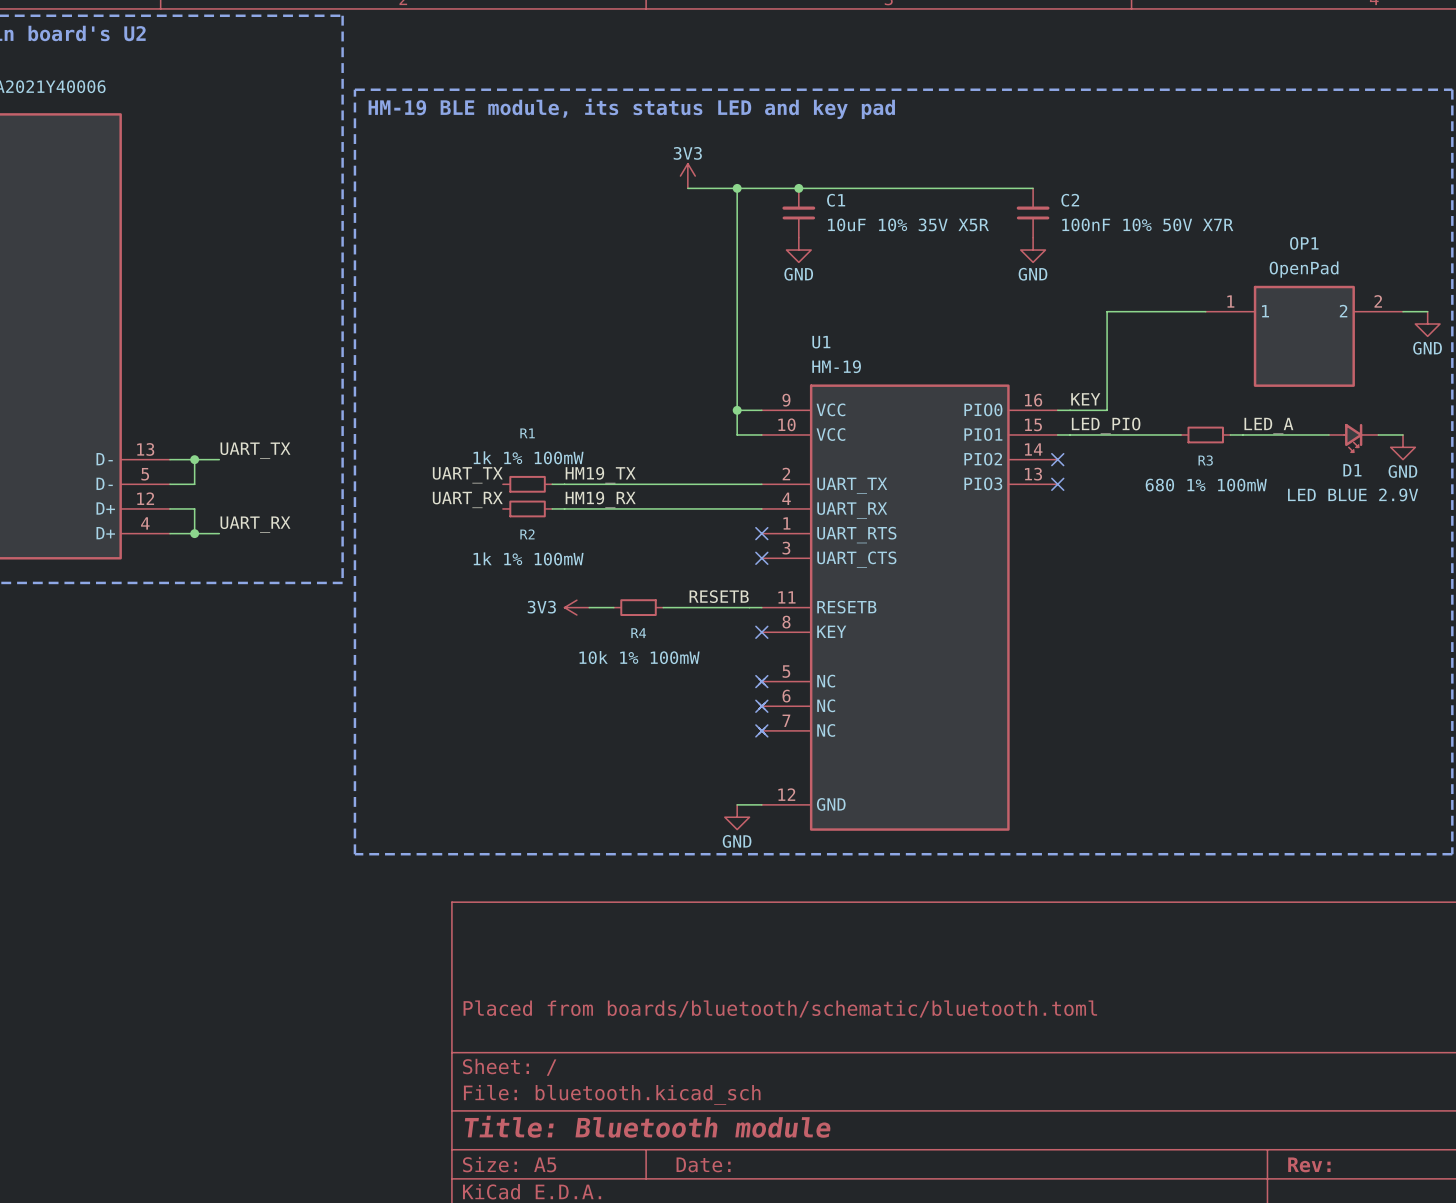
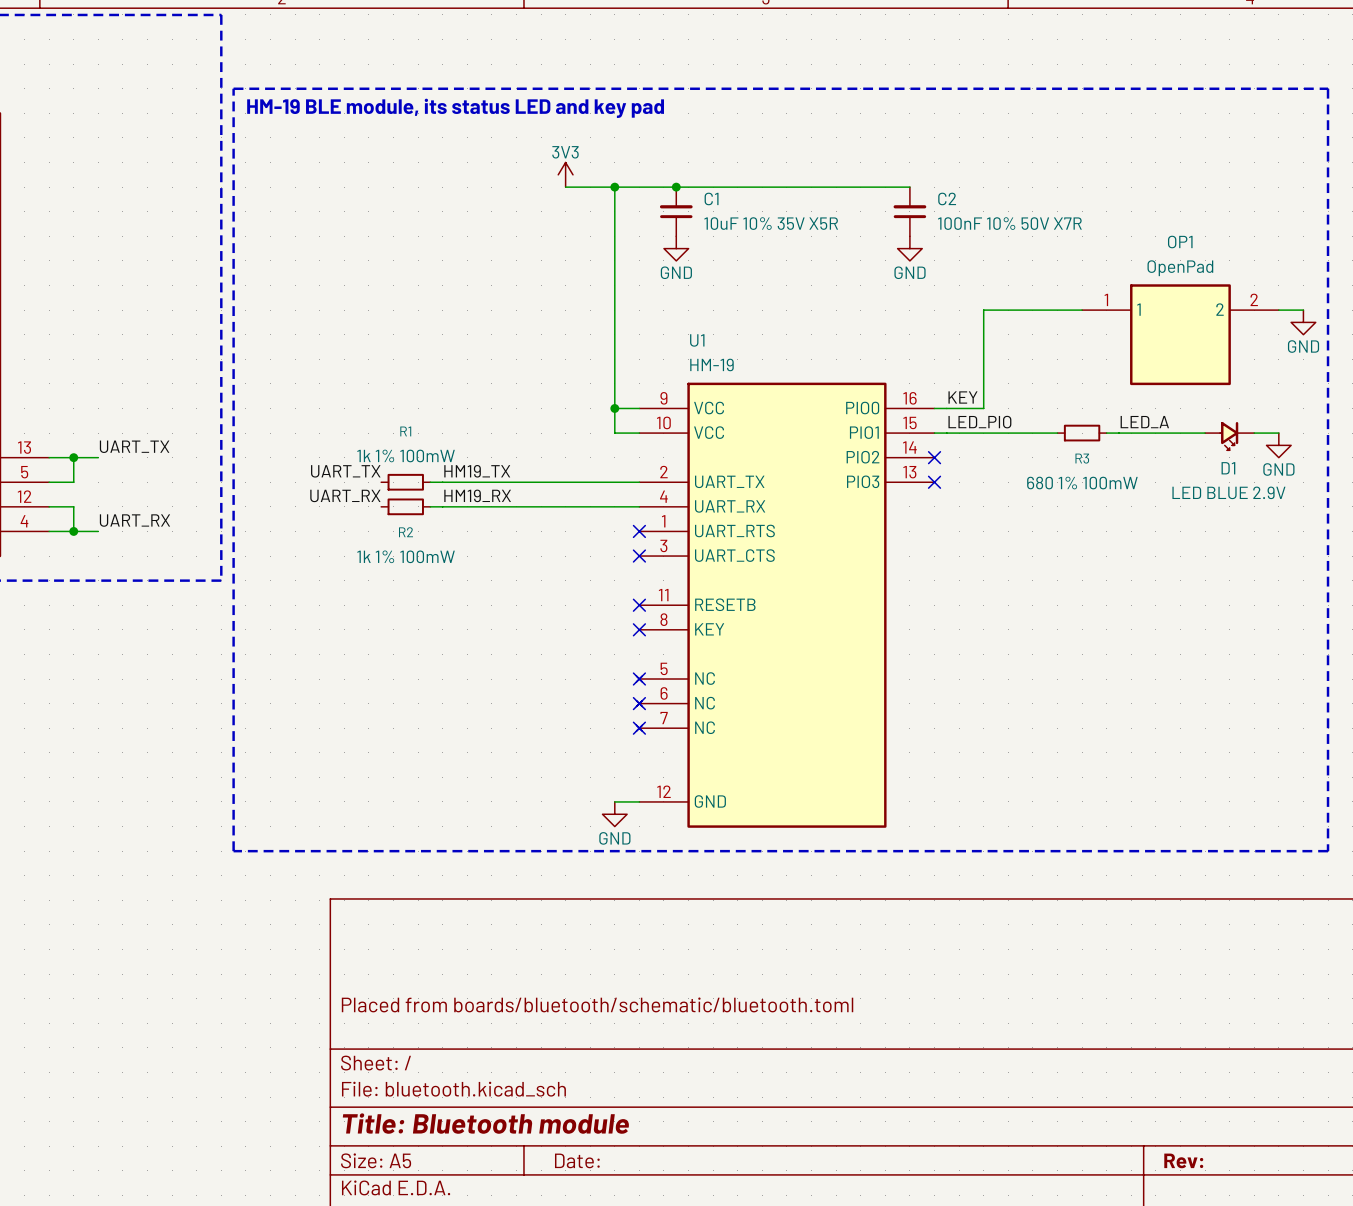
label: RESETB (719, 596) -> none
power symbol: 3V3 (576, 607) -> none
wire: (589, 607) (613, 607) -> none
R4: 10k 1% 100mW (638, 607) -> none
wire: (663, 607) (761, 607) -> none
no-connect mark: none -> (639, 605)

